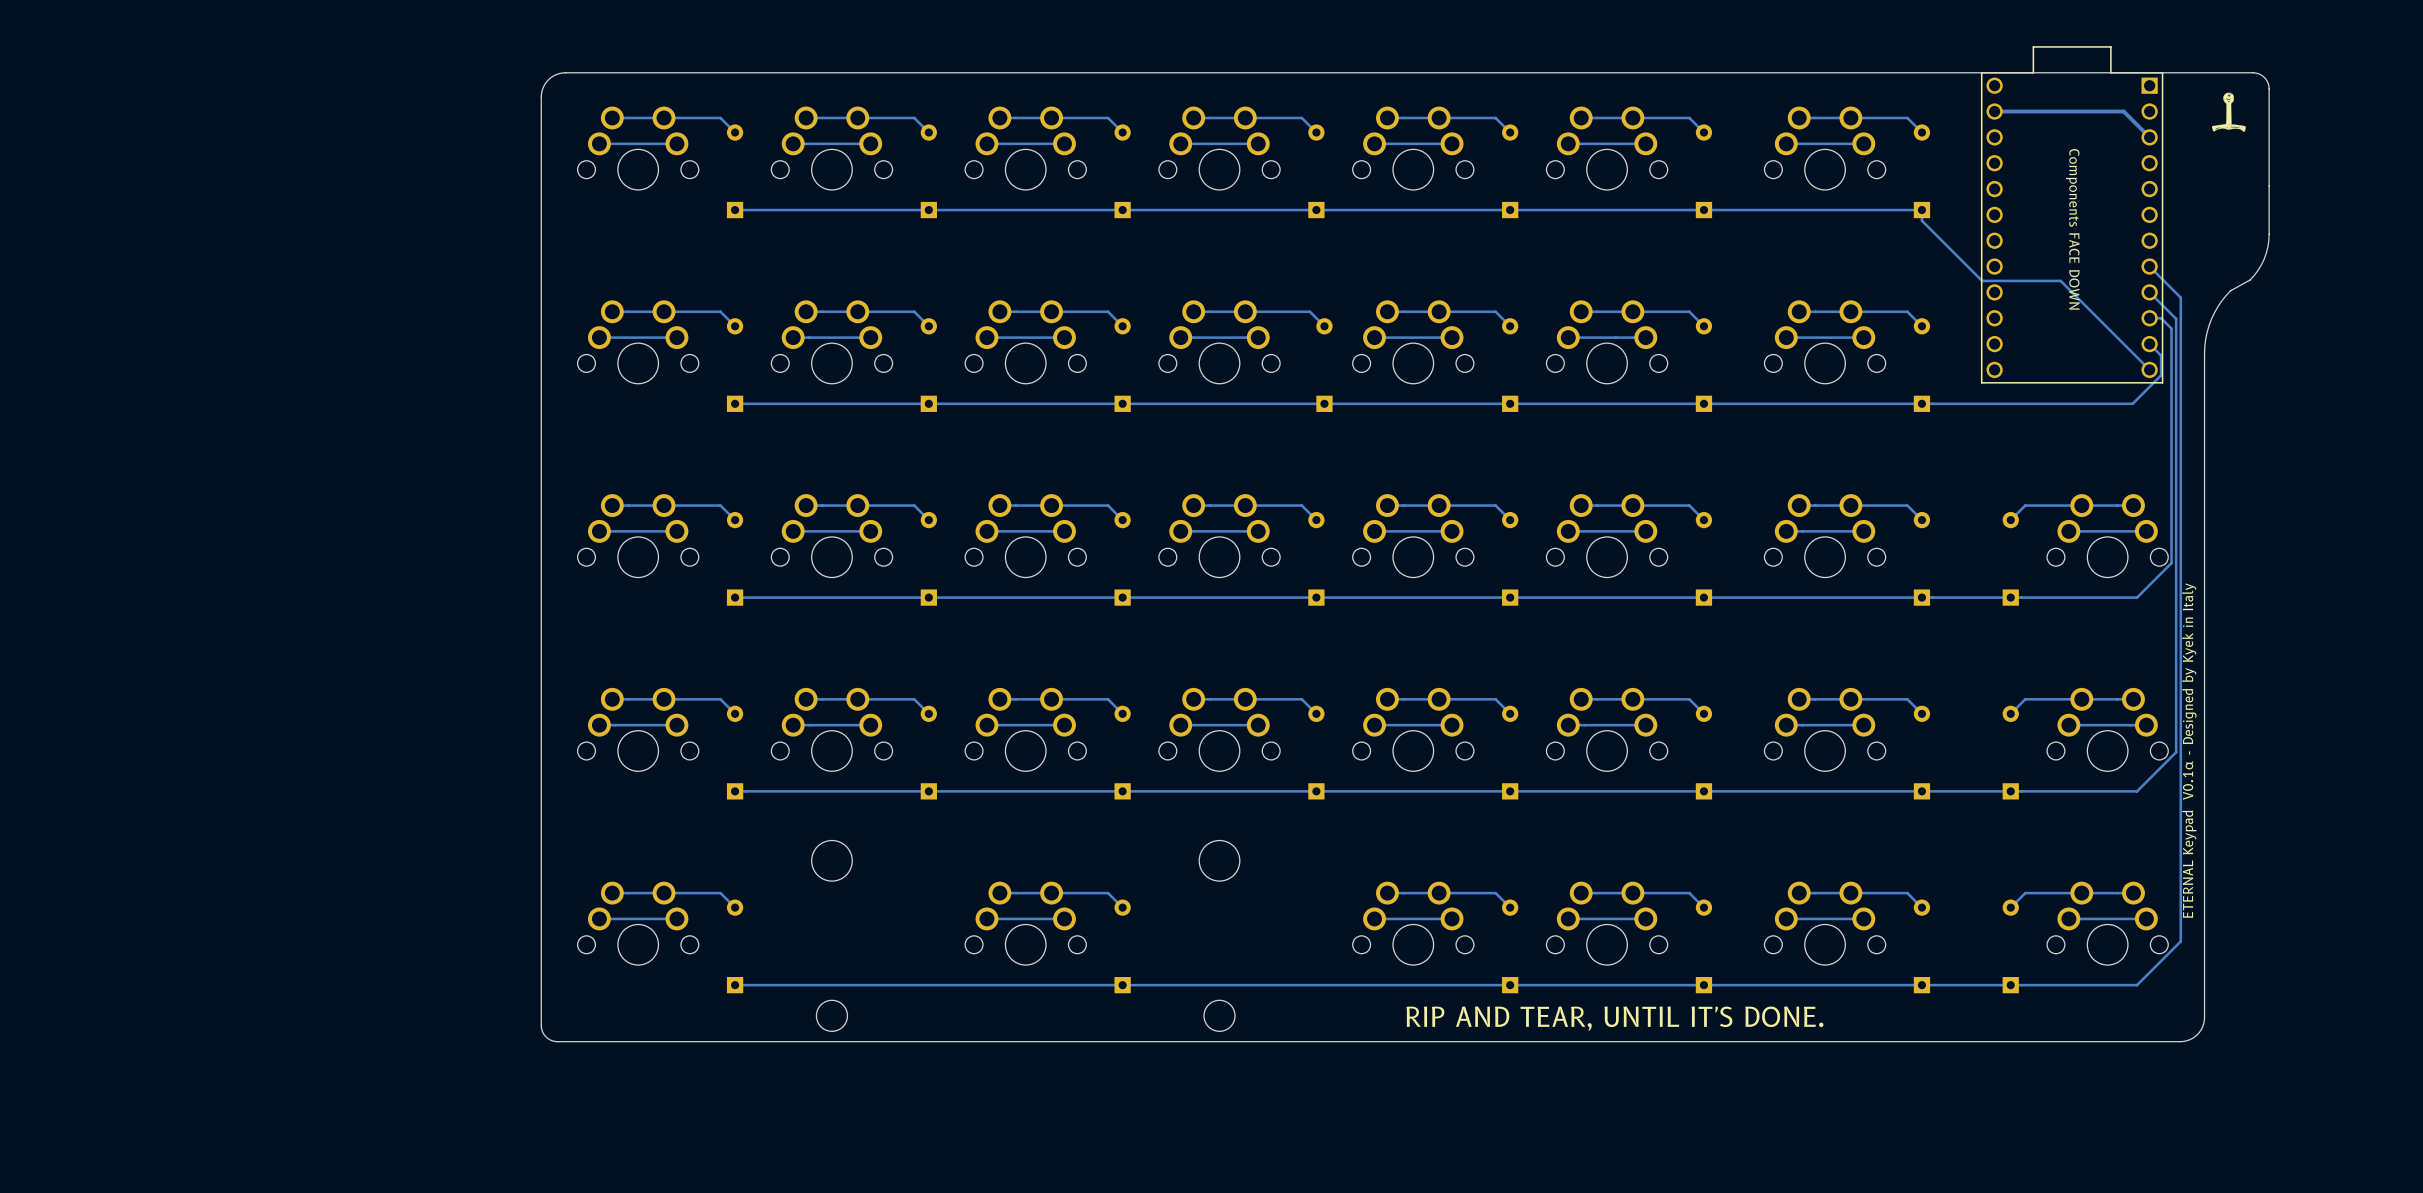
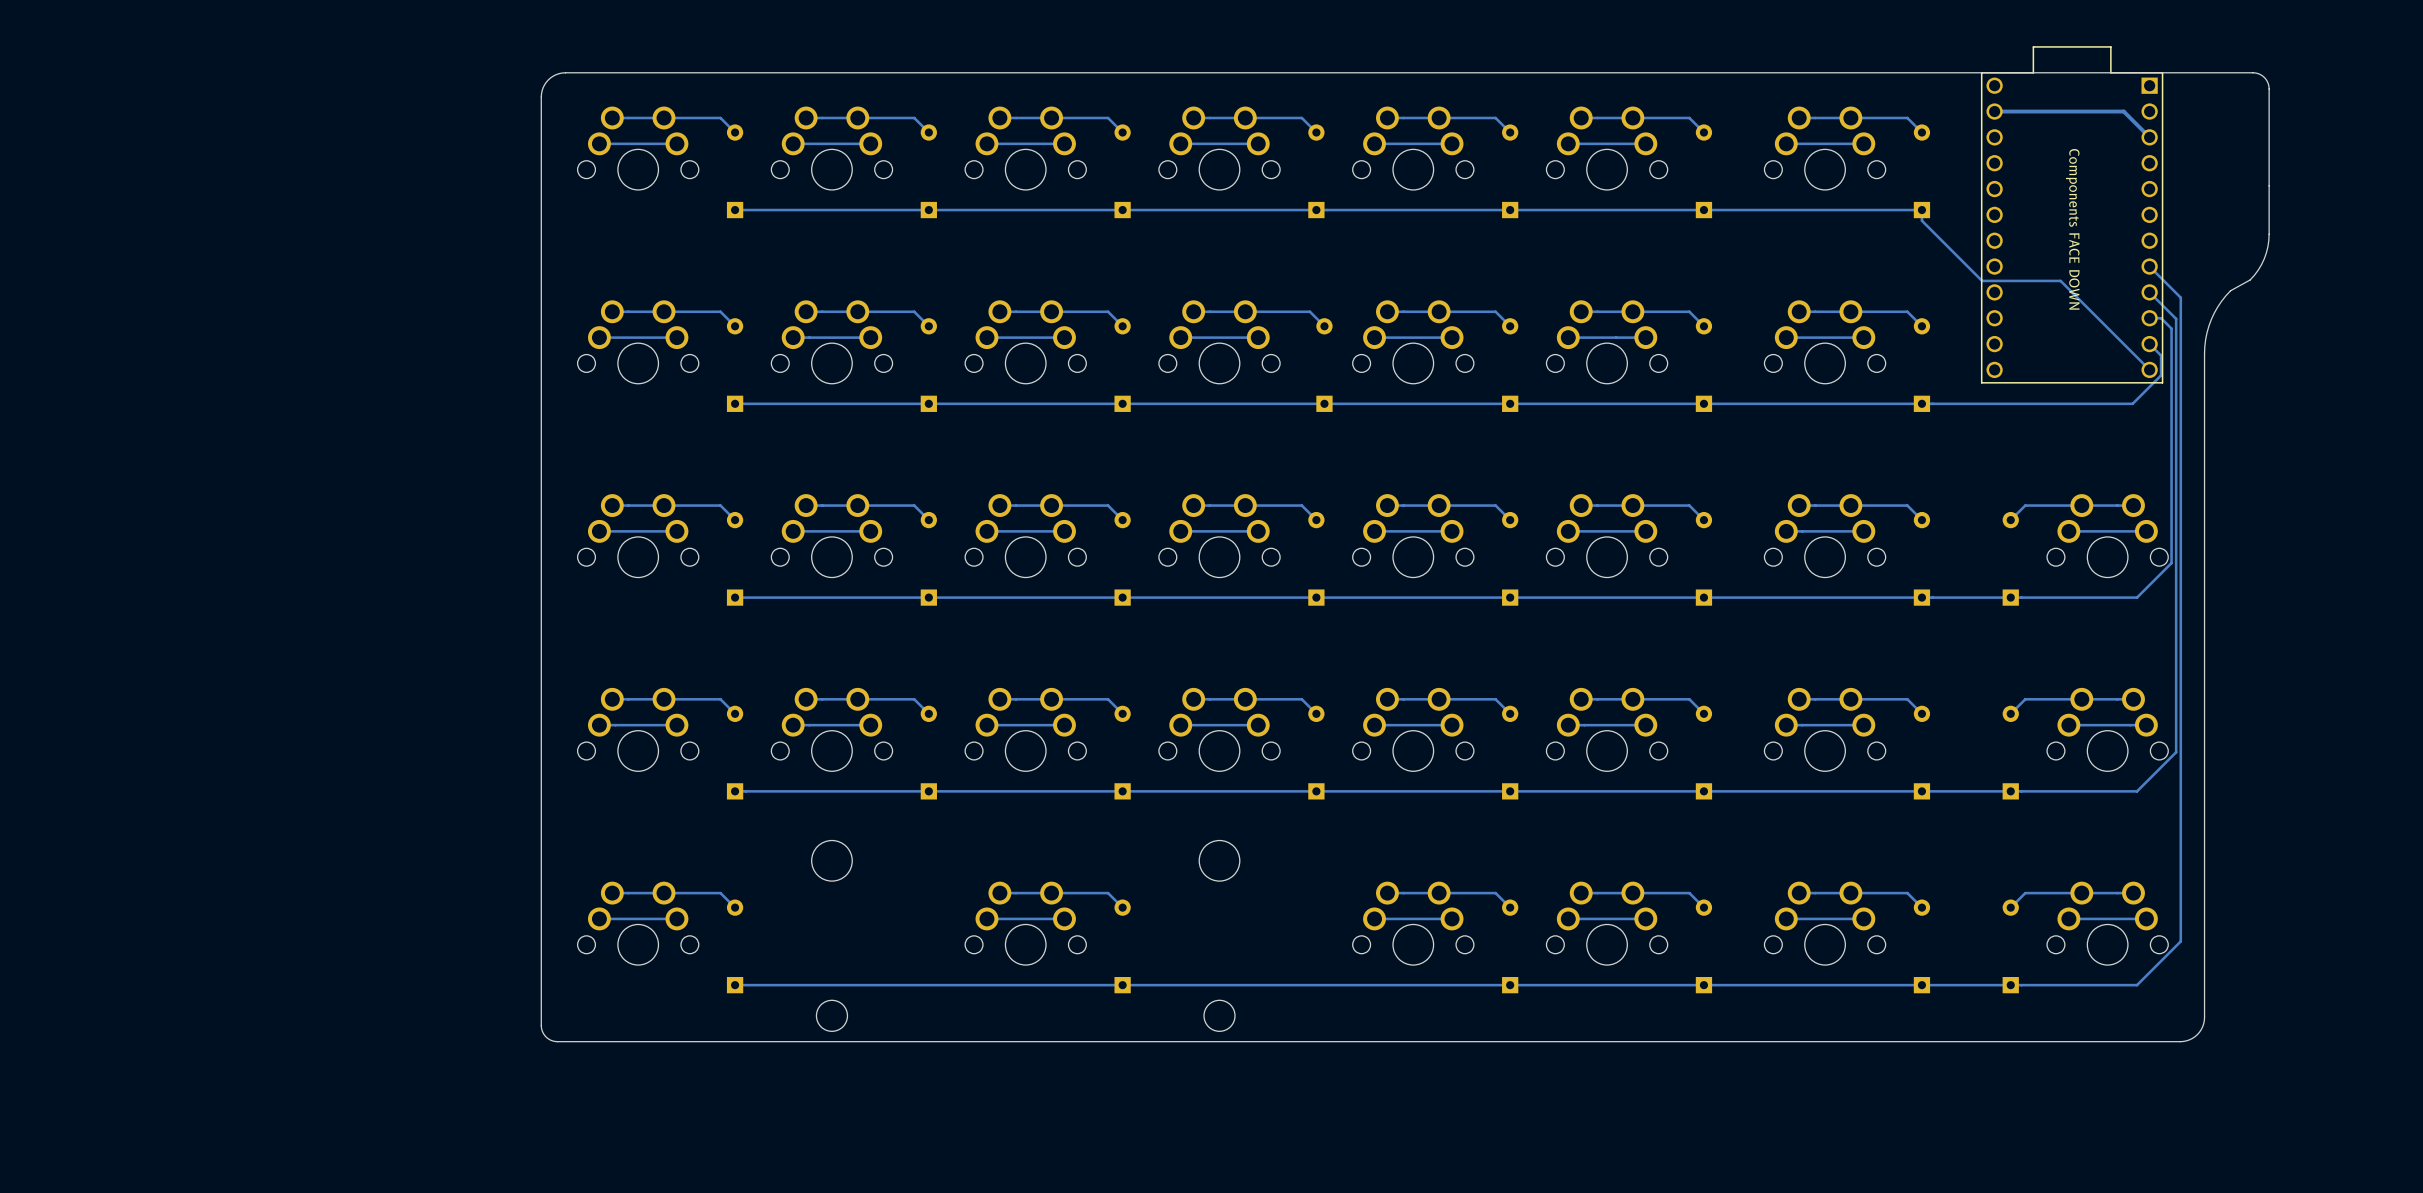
drawing: [2212, 92, 2246, 132] -> none
text: ETERNAL Keypad V0.1α - Designed by Kyek in Italy (2189, 750) -> none
text: RIP AND TEAR, UNTIL IT'S DONE. (1614, 1018) -> none

